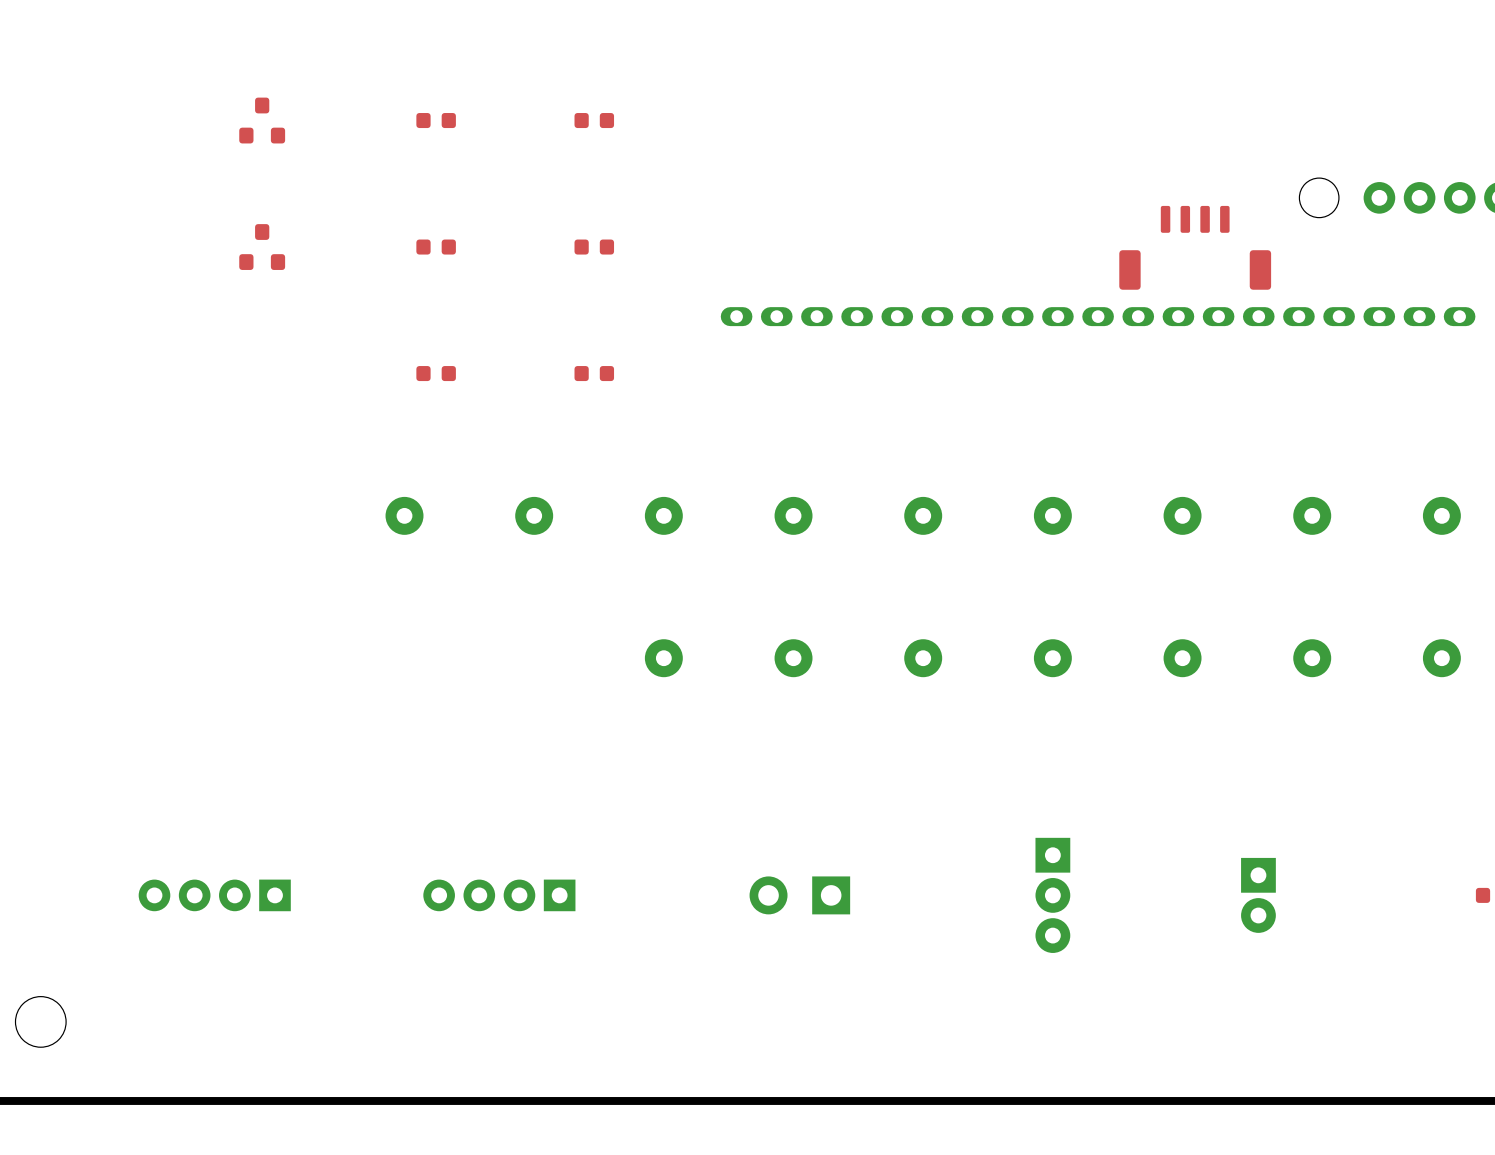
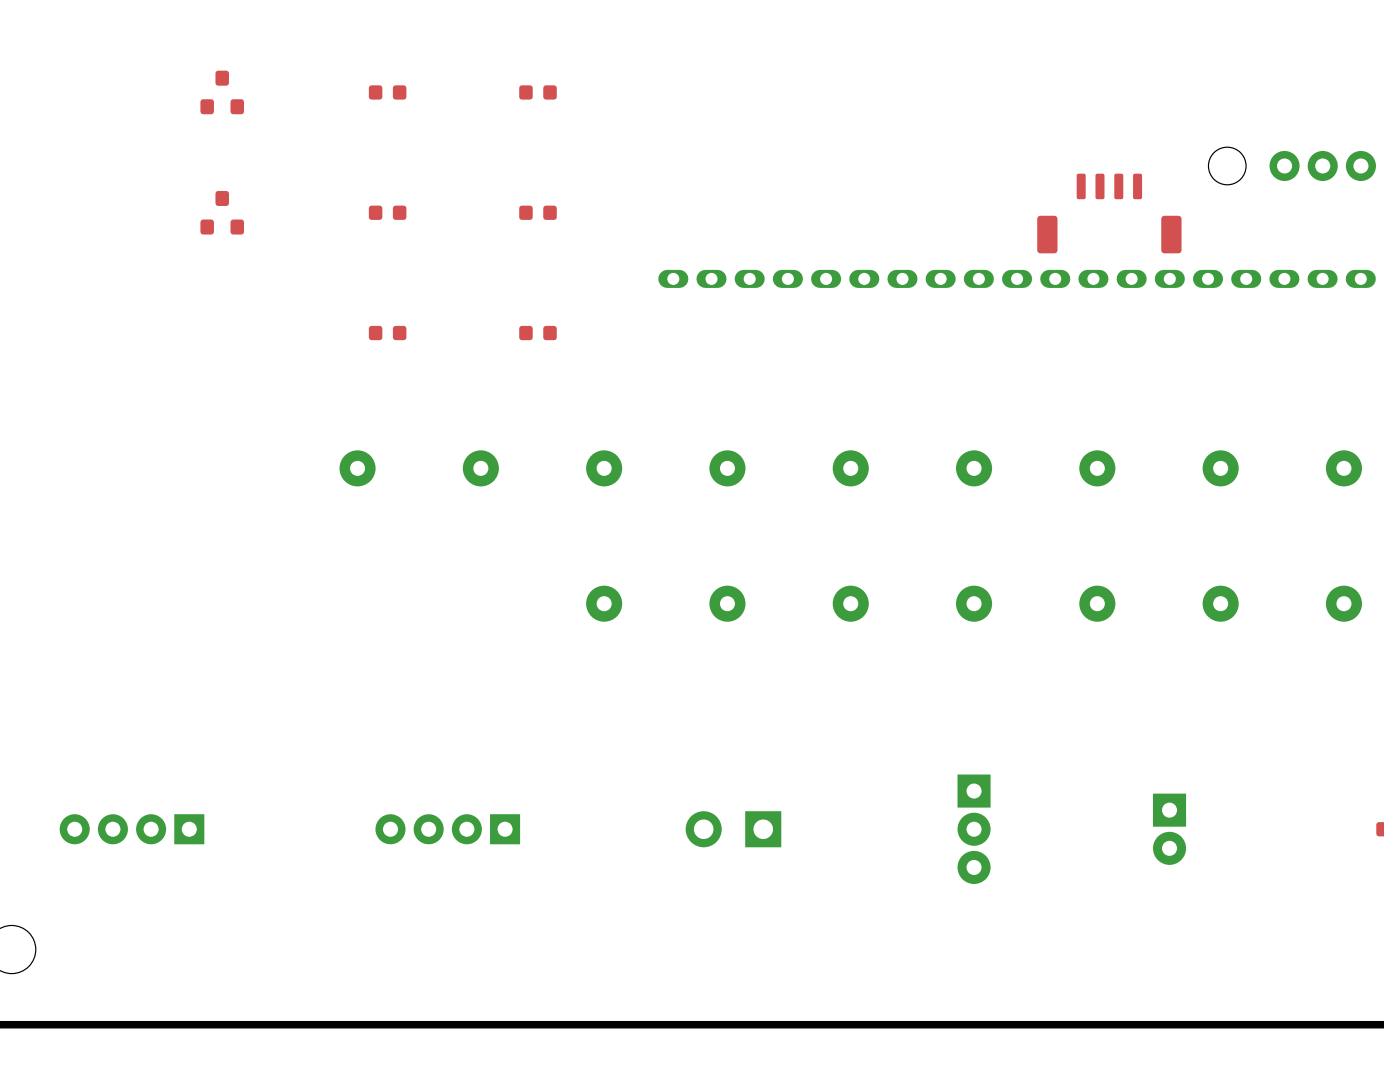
part position: (214, 895) -> (132, 829)

